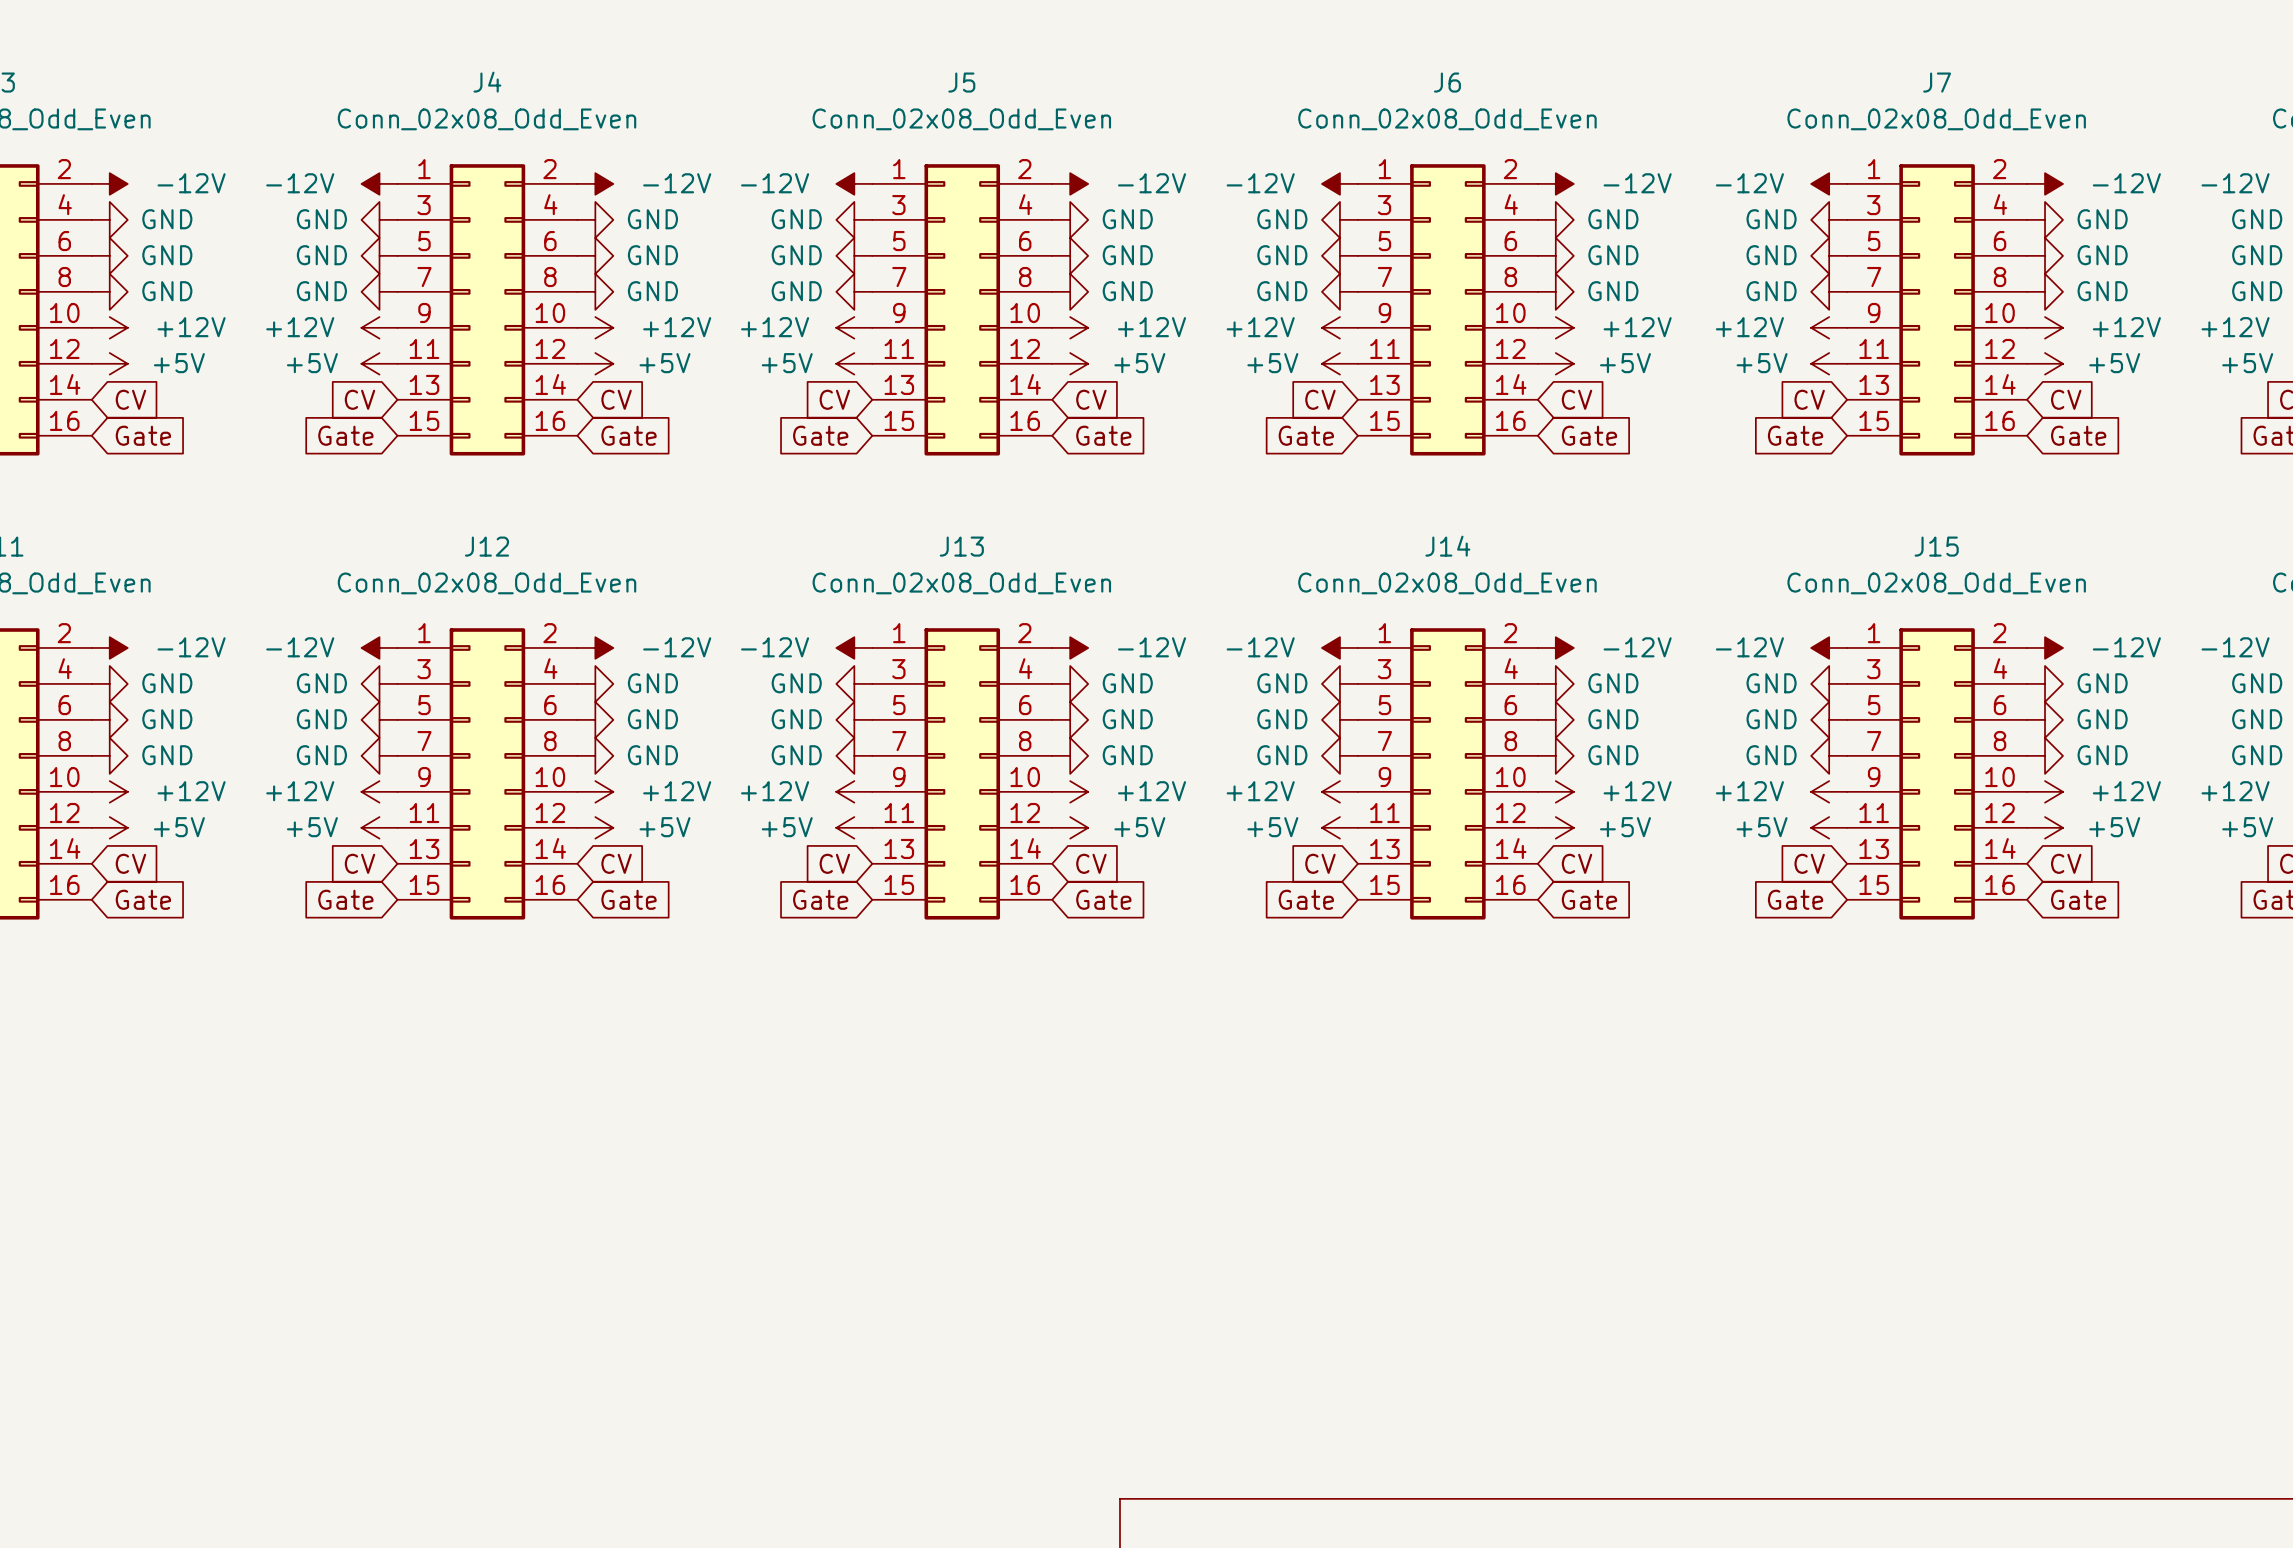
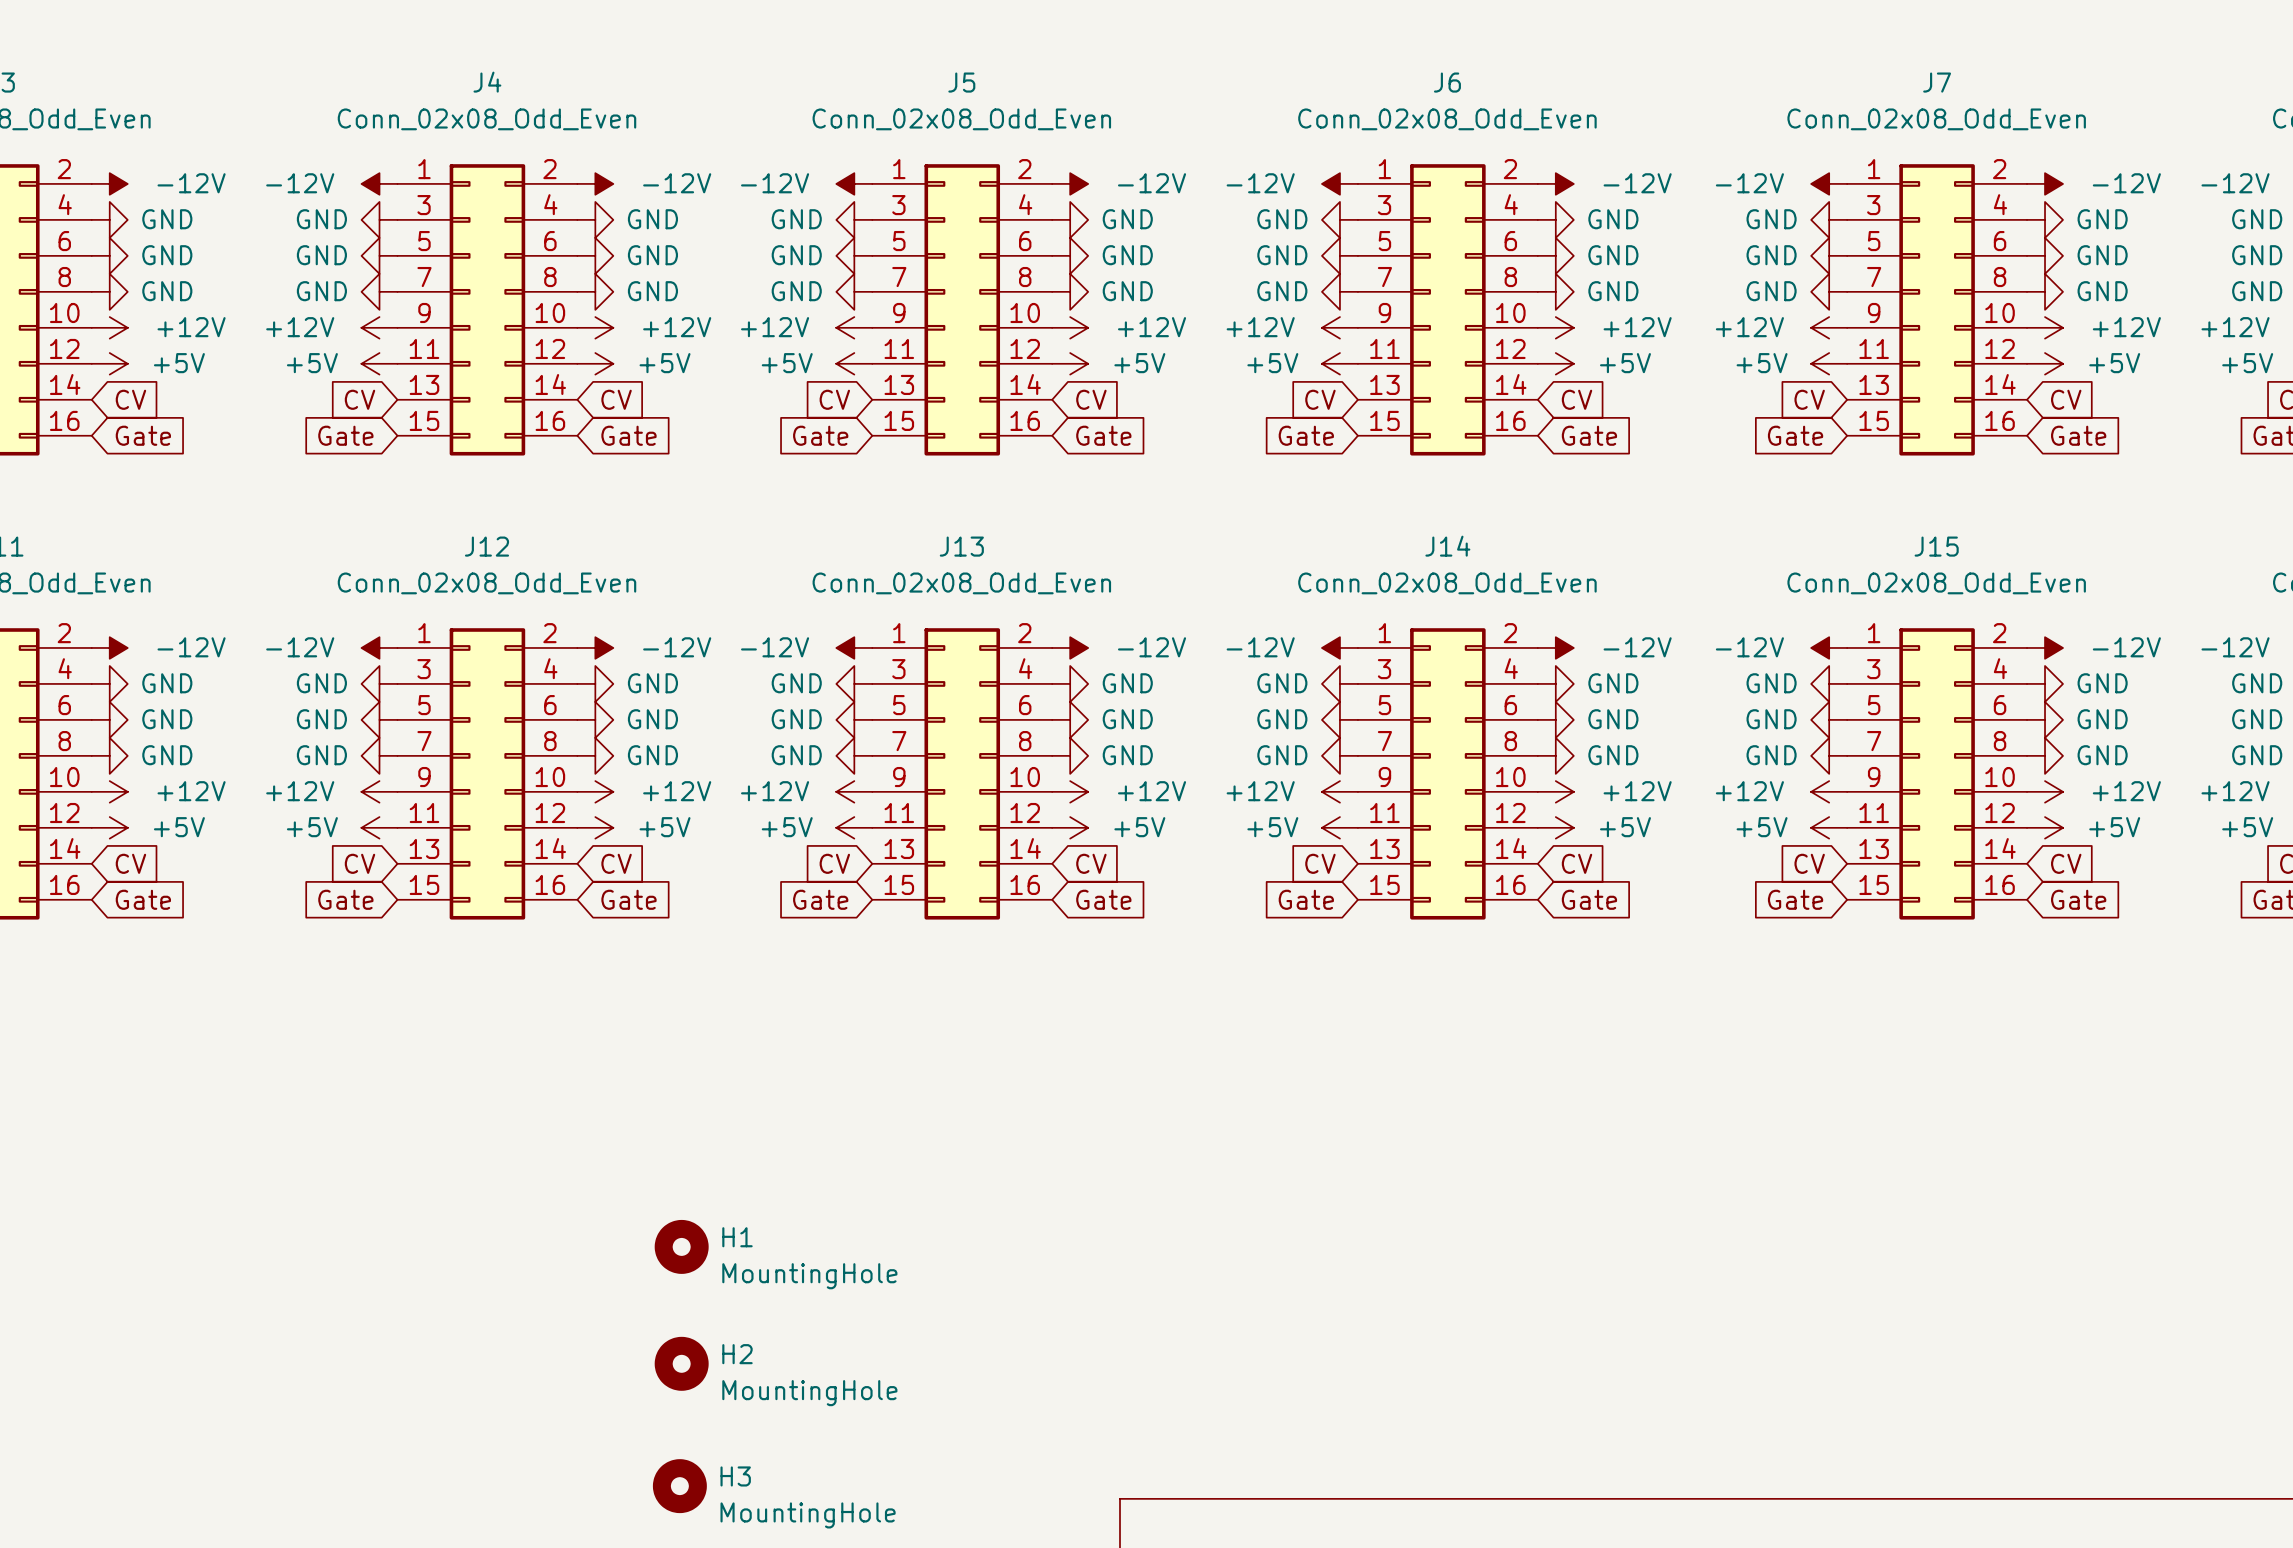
H1: none -> MountingHole (681, 1246)
H2: none -> MountingHole (681, 1363)
H3: none -> MountingHole (679, 1486)

